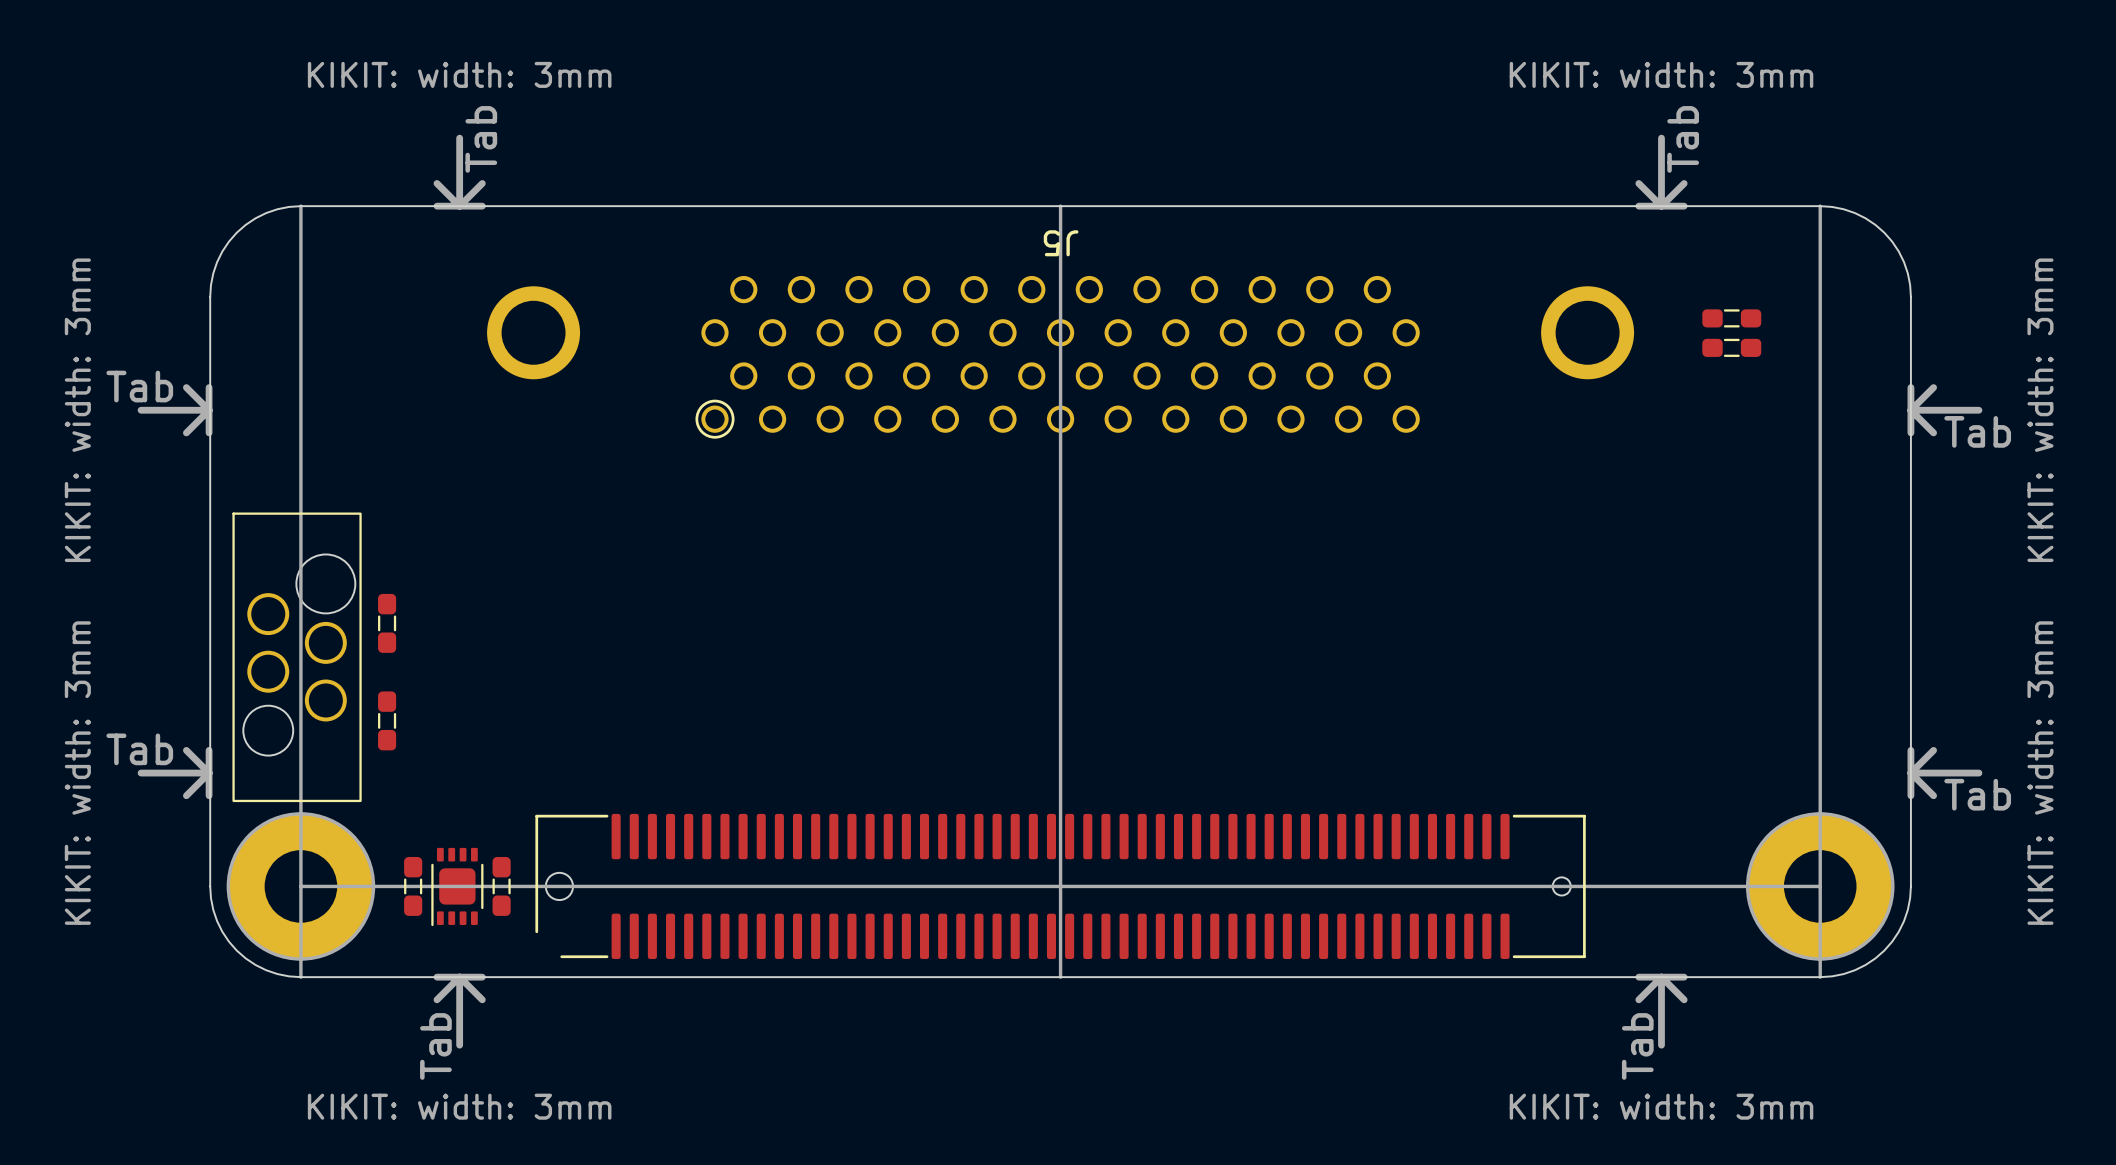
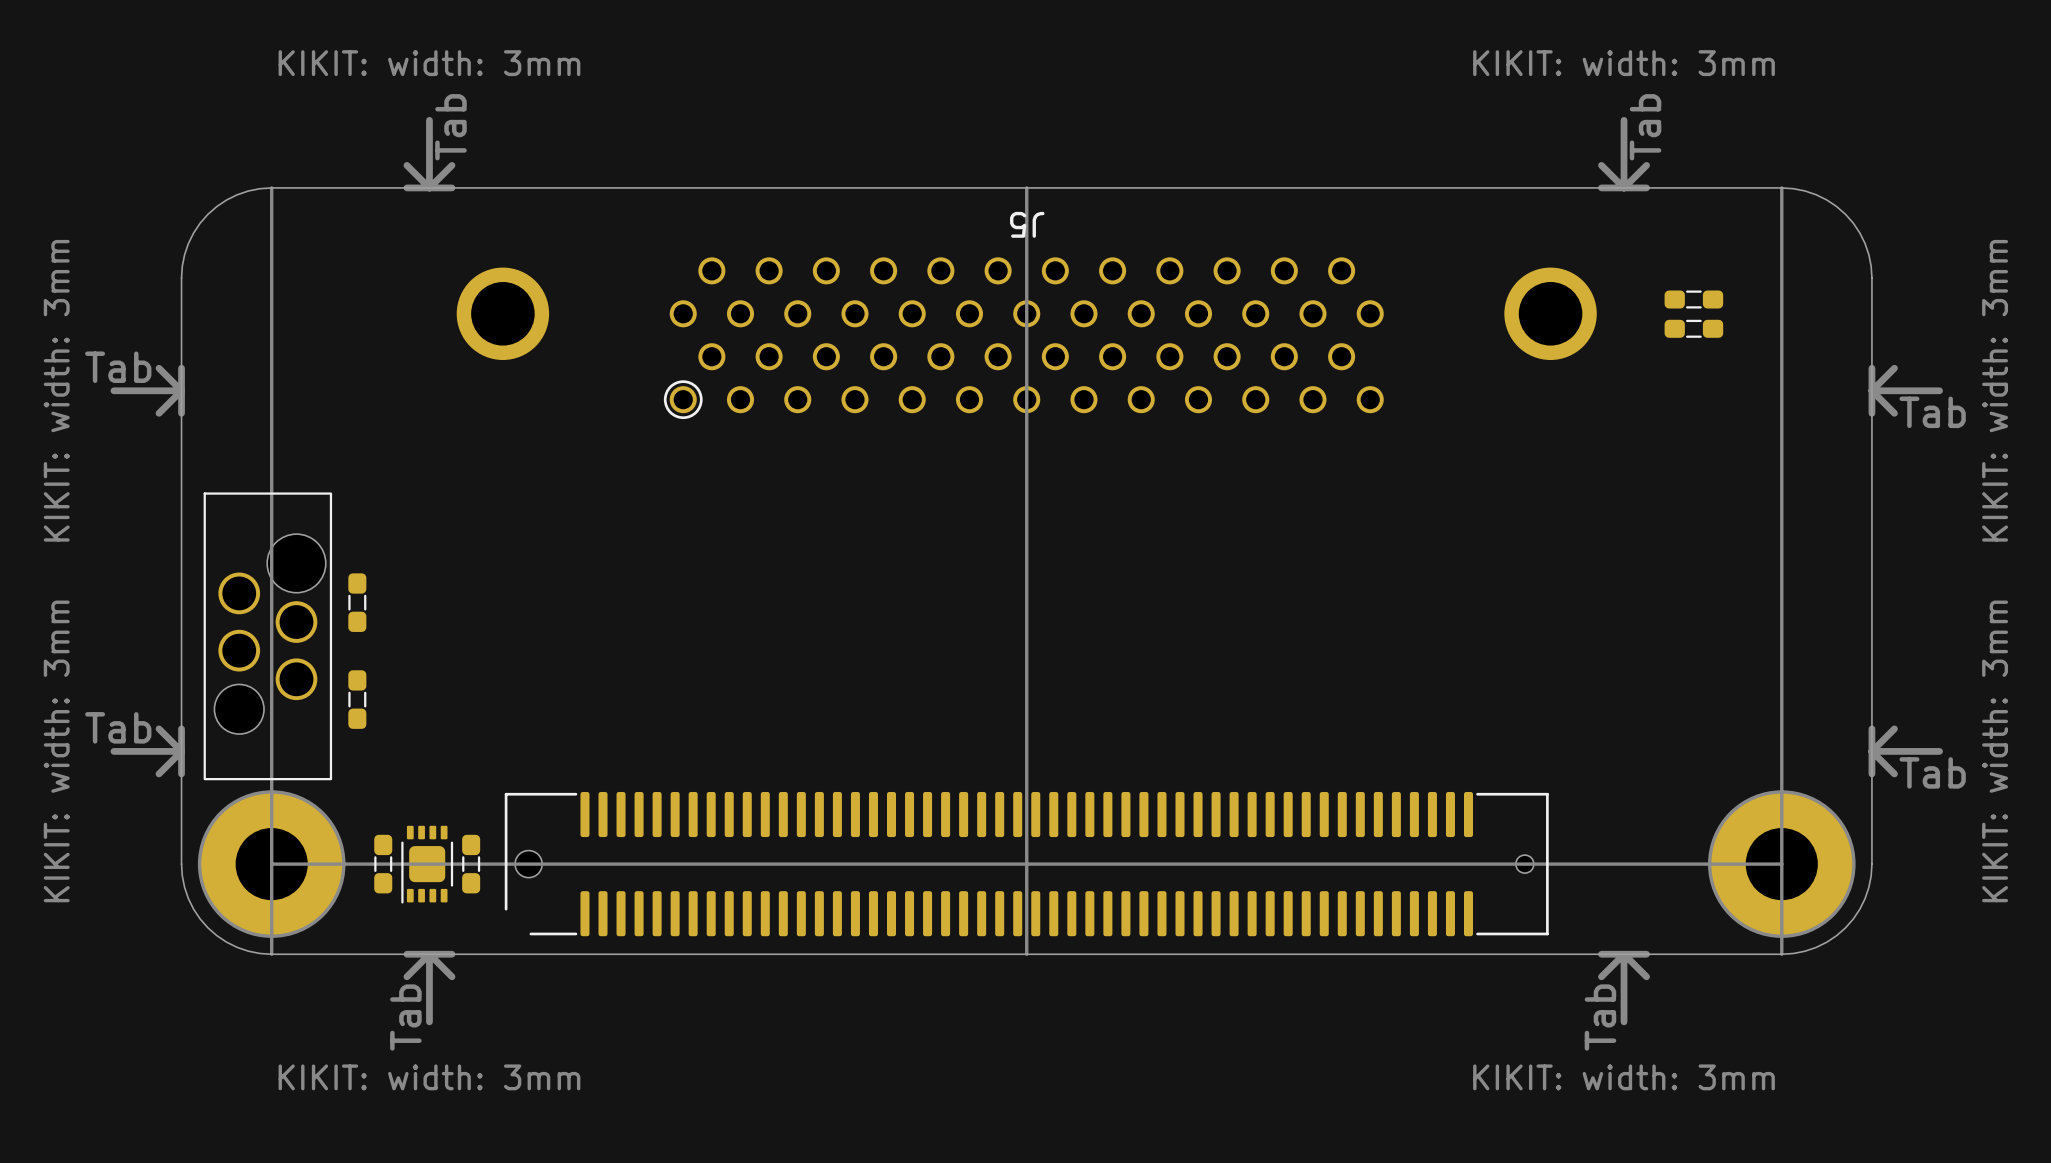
drawing shape: [307, 61, 612, 210] -> [278, 50, 581, 192]
drawing shape: [1509, 61, 1814, 210] -> [1473, 50, 1775, 192]
drawing shape: [64, 258, 213, 563] -> [43, 239, 185, 542]
drawing shape: [1907, 258, 2054, 563] -> [1868, 239, 2009, 542]
drawing shape: [64, 621, 213, 925] -> [43, 600, 185, 903]
drawing shape: [1907, 621, 2054, 925] -> [1868, 600, 2009, 903]
drawing shape: [307, 973, 612, 1120] -> [278, 950, 581, 1091]
drawing shape: [1509, 973, 1814, 1120] -> [1473, 950, 1775, 1091]

